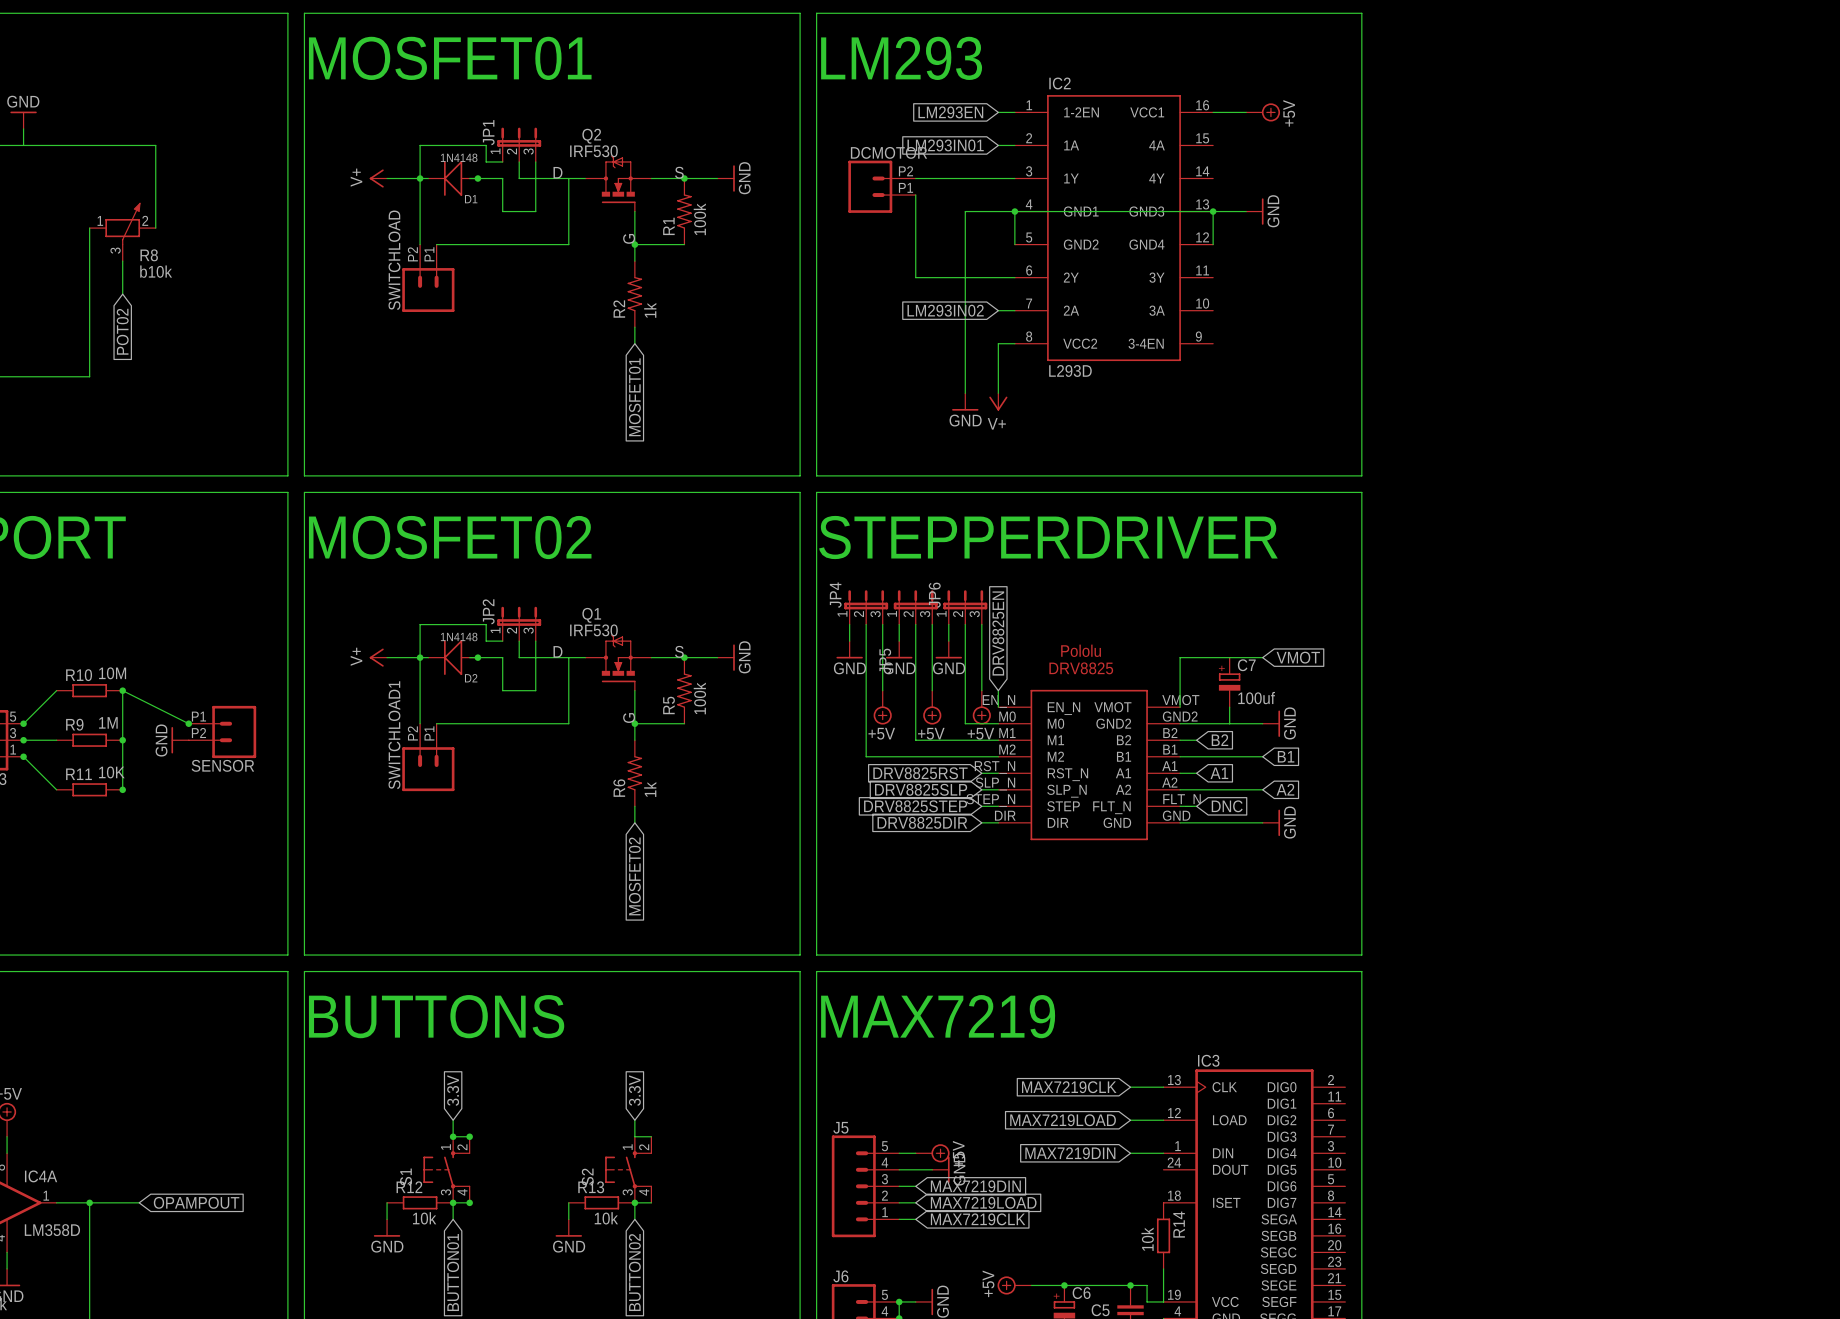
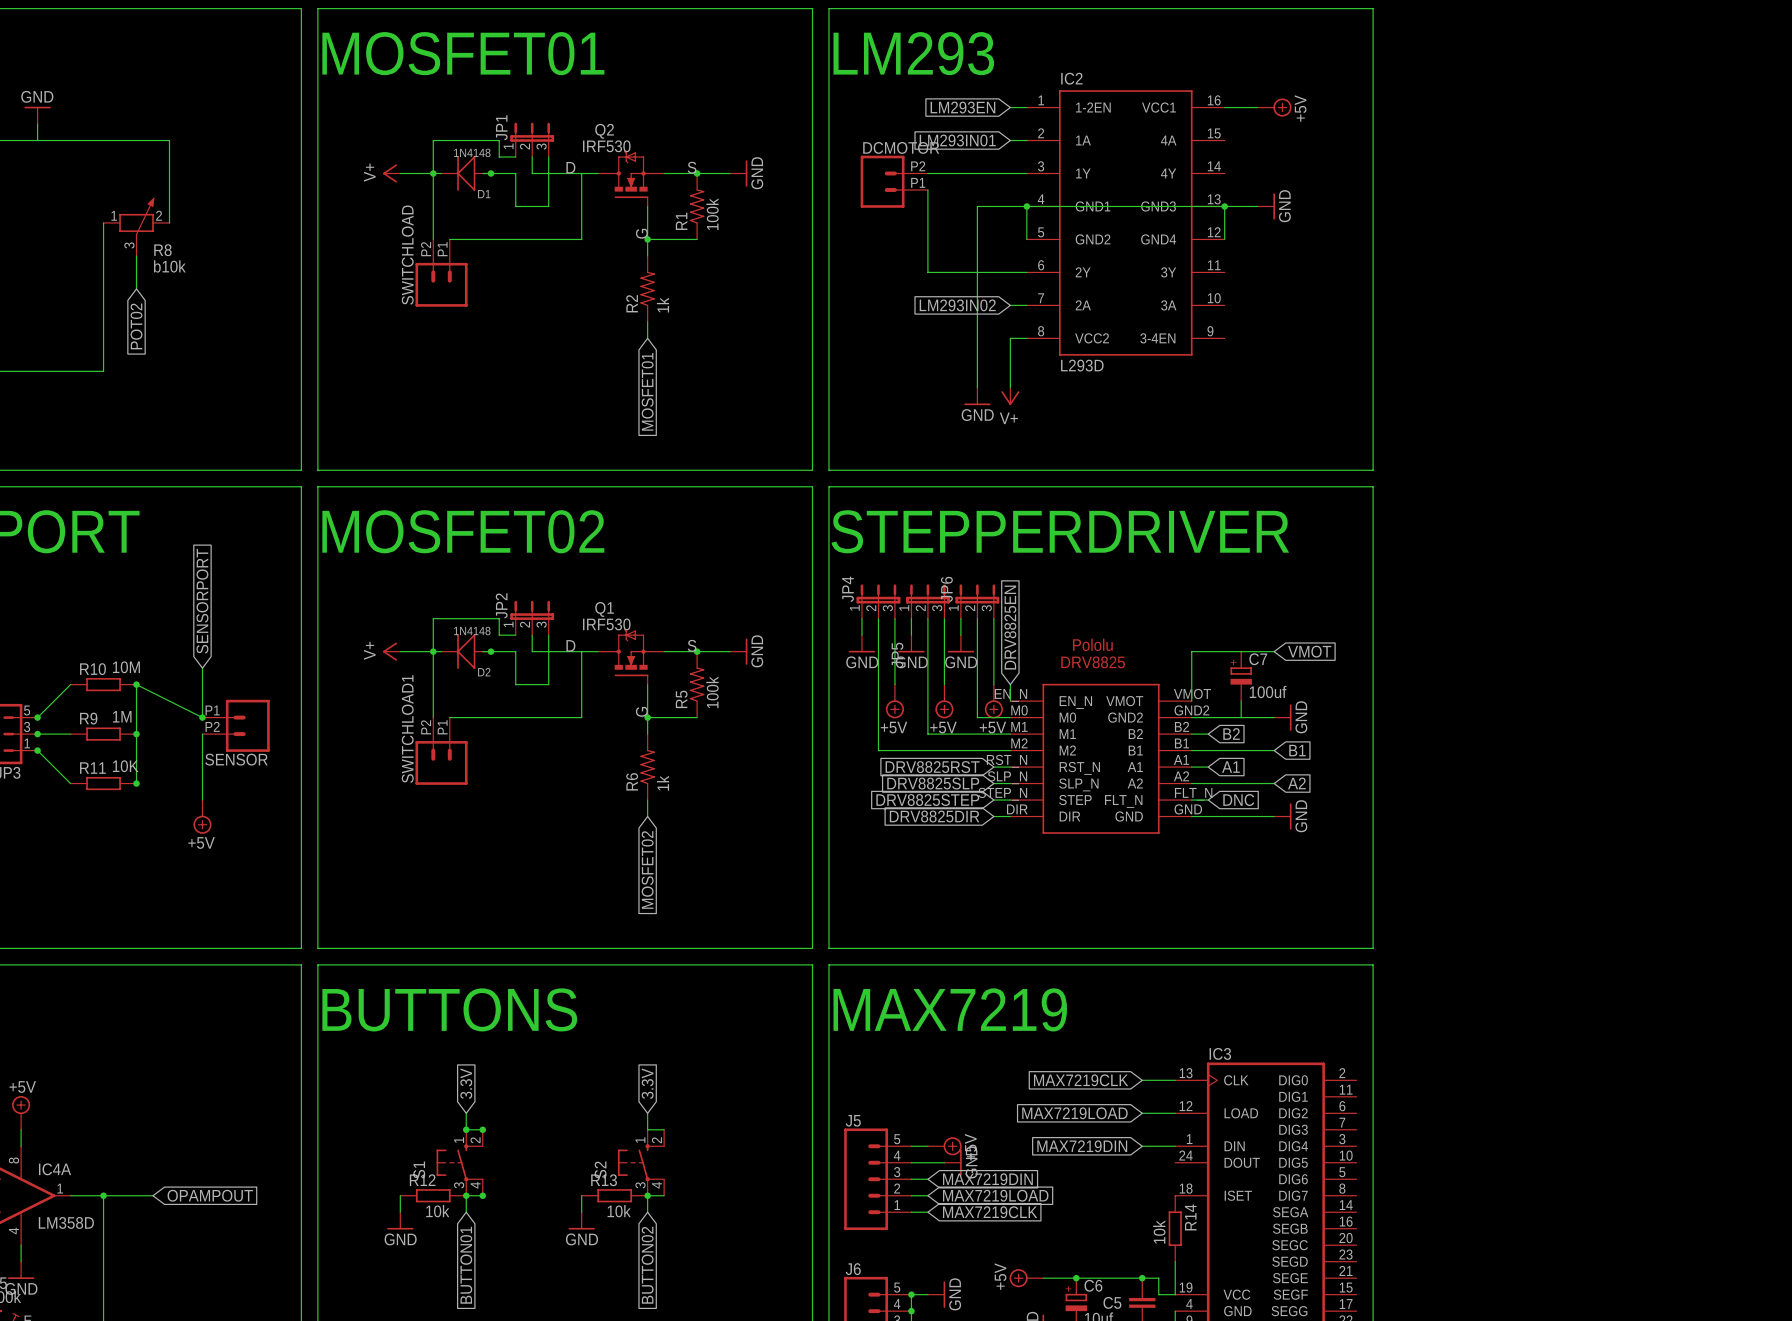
global label: none -> SENSORPORT (202, 601)
wire: none -> (202, 668) (202, 717)
power symbol: GND (180, 740) -> none
wire: none -> (202, 734) (202, 800)
power symbol: none -> +5V (202, 816)

